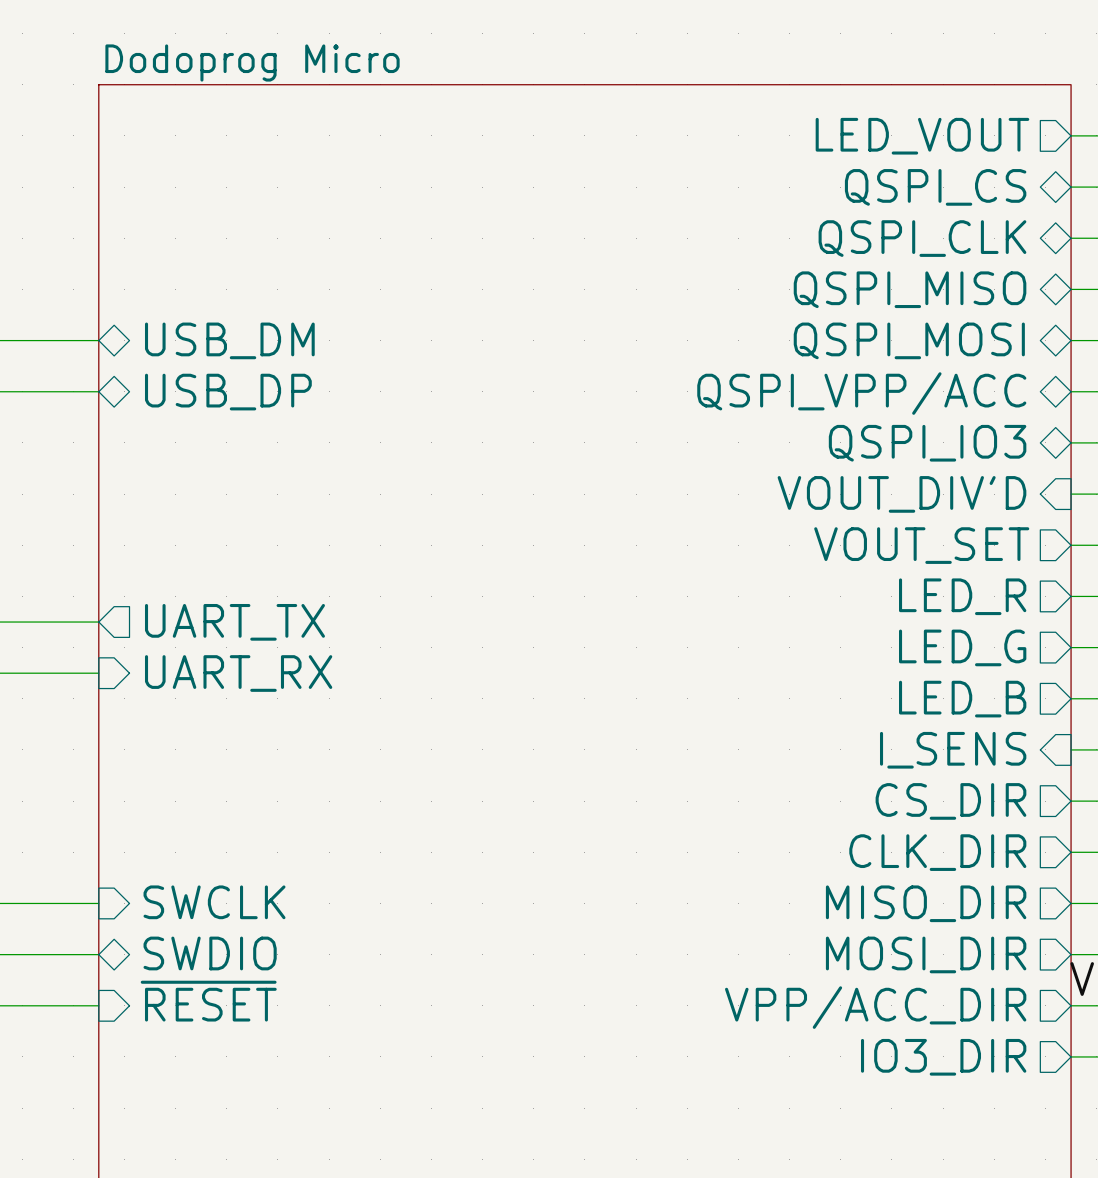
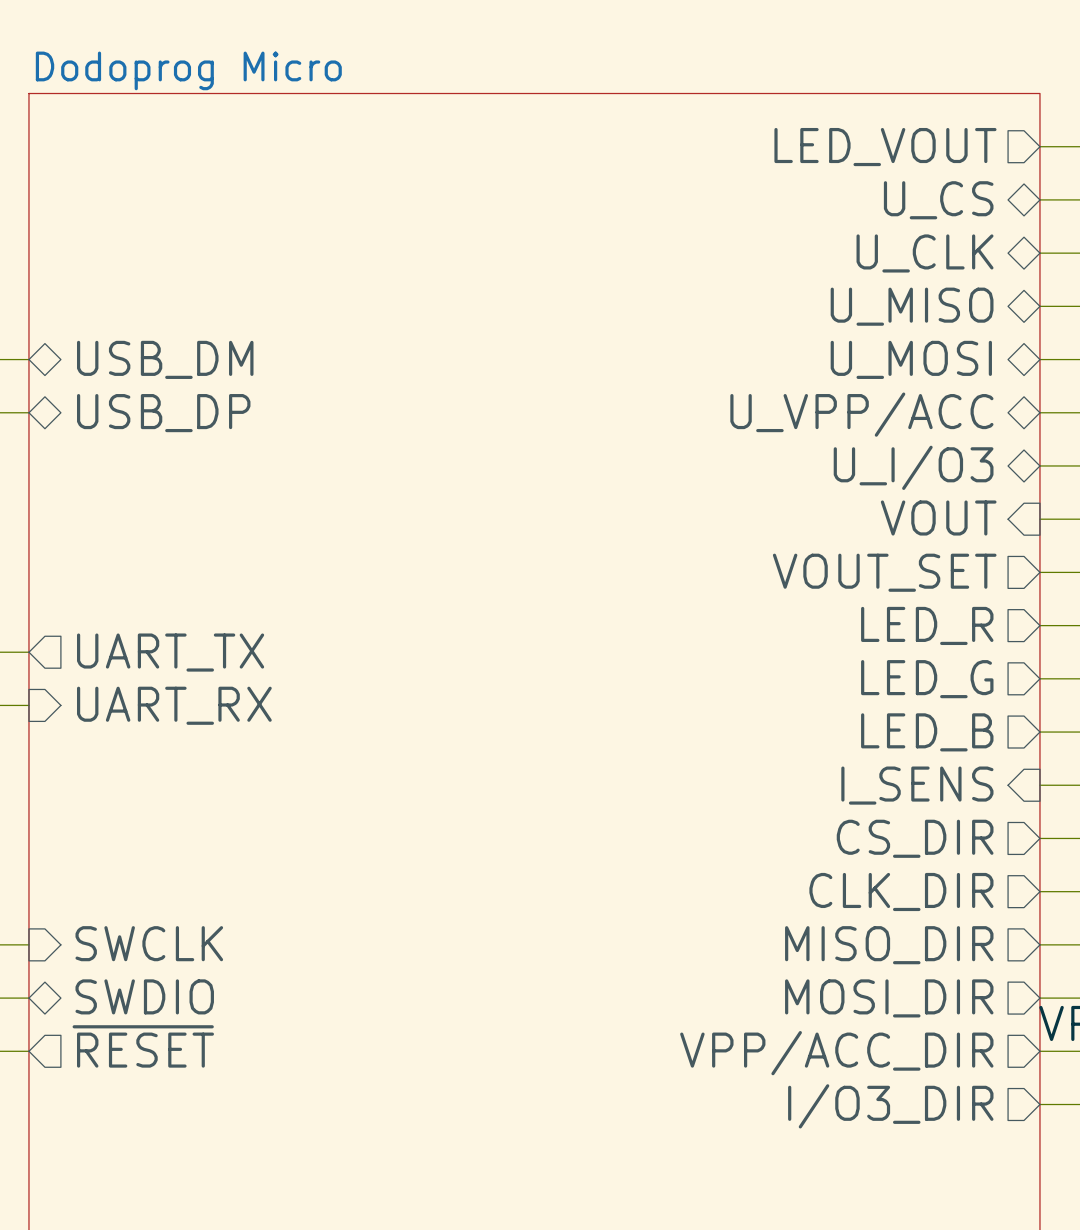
sheet pin: QSPI_CS (935, 187) -> U_CS (938, 200)
sheet pin: QSPI_CLK (922, 238) -> U_CLK (925, 253)
sheet pin: QSPI_MISO (910, 289) -> U_MISO (912, 306)
sheet pin: QSPI_MOSI (909, 340) -> U_MOSI (911, 359)
sheet pin: QSPI_VPP/ACC (861, 393) -> U_VPP/ACC (861, 414)
sheet pin: QSPI_IO3 (927, 443) -> U_I/O3 (913, 467)
sheet pin: VOUT_DIV'D (901, 494) -> VOUT (938, 518)
sheet pin shape: input (208, 1001) -> output (143, 1046)
sheet pin: IO3_DIR (943, 1057) -> I/O3_DIR (890, 1106)

